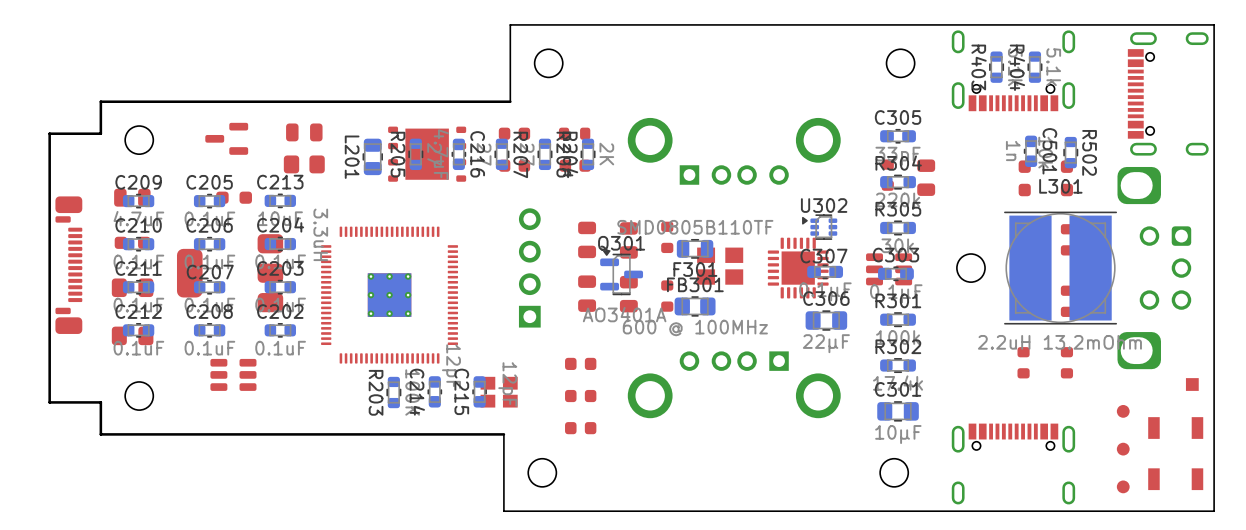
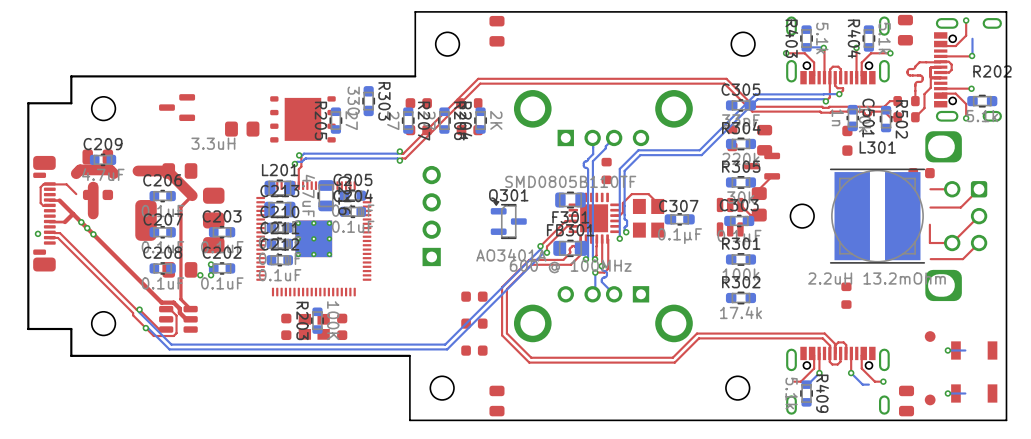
top track: none -> (966, 20) (966, 35) (955, 46) (942, 46) (940, 44)
via: none -> (966, 20)
part: none -> (905, 30)
part: none -> (496, 31)
bottom track: none -> (972, 38) (972, 55)
bottom track: none -> (806, 47) (823, 47)
top track: none -> (823, 47) (824, 77)
R403 position: (996, 67) -> (806, 38)
via: none -> (823, 47)
R404 position: (1034, 67) -> (868, 38)
top track: none -> (856, 47) (856, 77)
via: none -> (856, 47)
top track: none -> (786, 53) (804, 53) (814, 62) (814, 75) (812, 77)
via: none -> (786, 53)
top track: none -> (890, 53) (871, 53) (861, 62) (861, 75) (863, 77)
via: none -> (890, 53)
top track: none -> (972, 55) (940, 56)
via: none -> (972, 55)
top track: none -> (940, 72) (949, 72) (951, 69) (951, 64) (948, 61) (919, 62) (914, 68) (908, 70) (909, 75) (920, 75) (922, 77) (921, 81) (915, 83) (915, 101)
top track: none -> (835, 77) (835, 85) (837, 88) (843, 88) (839, 94)
top track: none -> (829, 77) (829, 97) (825, 101)
top track: none -> (840, 77) (840, 69) (838, 66) (832, 66) (830, 69) (830, 77)
top track: none -> (940, 77) (930, 78) (930, 87) (924, 94) (924, 108) (915, 117)
top track: none -> (940, 77) (940, 77) (930, 77) (930, 67) (940, 67) (931, 67) (930, 68) (930, 76) (931, 77) (940, 77)
top track: none -> (971, 88) (940, 88)
via: none -> (971, 88)
bottom track: none -> (839, 94) (755, 94) (699, 150) (638, 150) (619, 168) (619, 238)
via: none -> (839, 94)
top track: none -> (940, 95) (942, 93) (955, 93) (966, 104) (966, 118)
bottom track: none -> (825, 101) (823, 99) (757, 99) (701, 155) (640, 155) (624, 170) (624, 218) (627, 221) (624, 230) (626, 232)
via: none -> (825, 101)
top track: none -> (897, 101) (889, 101) (884, 106) (754, 106) (726, 78) (478, 78) (403, 153) (399, 151)
part: none -> (906, 101)
part: (304, 132) -> none
C216 footprint: [451, 138, 467, 171] -> [317, 180, 335, 212]
top track: none -> (897, 117) (889, 117) (884, 111) (872, 111) (869, 115) (865, 115) (862, 111) (752, 111) (724, 83) (480, 83) (405, 158) (399, 160)
part: none -> (906, 117)
via: none -> (966, 118)
part position: (427, 154) -> (302, 119)
L201 rotation: 0° (372, 156) -> 90° clockwise (279, 188)
L201 position: (372, 156) -> (279, 188)
bottom track: none -> (592, 137) (593, 154) (583, 163) (584, 166) (588, 169) (588, 257) (585, 259)
bottom track: none -> (614, 137) (592, 161) (592, 257) (595, 259)
R202 side: top (1066, 178) -> bottom (982, 101)
bottom track: none -> (399, 151) (397, 153) (303, 153) (299, 155)
via: none -> (399, 151)
C213 footprint: [264, 193, 296, 209] -> [264, 200, 296, 219]
top track: none -> (299, 155) (301, 157) (301, 166) (298, 169) (298, 185)
via: none -> (299, 155)
R303 side: top (234, 197) -> bottom (368, 101)
C205 position: (209, 201) -> (352, 195)
bottom track: none -> (399, 160) (397, 158) (305, 158) (294, 164)
via: none -> (399, 160)
via: none -> (294, 164)
part: none -> (762, 166)
top track: none -> (116, 170) (113, 173) (110, 169) (80, 169) (76, 173)
top track: none -> (137, 170) (168, 170) (192, 195) (180, 207) (180, 299) (190, 309)
part: none -> (179, 170)
part: none -> (606, 170)
part: none -> (921, 173)
top track: none -> (772, 176) (759, 189) (759, 193)
U302: (819, 227) -> none
top track: none -> (96, 183) (93, 187) (93, 213)
top track: none -> (952, 189) (930, 189)
top track: none -> (979, 189) (960, 207) (930, 207)
part: (667, 237) -> none
part footprint: [767, 237, 829, 299] -> [632, 198, 665, 238]
part: (587, 239) -> none
part: (1066, 239) -> none
part: (628, 240) -> none
top track: none -> (76, 194) (66, 184) (43, 184) (40, 187) (40, 203) (43, 205) (49, 205)
C210 position: (138, 244) -> (279, 227)
C204 position: (280, 244) -> (352, 211)
part footprint: [697, 247, 744, 285] -> [568, 192, 620, 244]
top track: none -> (49, 200) (59, 200) (161, 302) (173, 302) (186, 319) (190, 319)
part: none -> (759, 204)
top track: none -> (740, 204) (750, 215) (759, 215)
top track: none -> (657, 206) (657, 203) (648, 194) (631, 194) (622, 203) (622, 212) (619, 215) (614, 215)
top track: none -> (73, 213) (65, 222) (49, 222)
top track: none -> (979, 216) (952, 243) (929, 243) (929, 224)
part rotation: 0° (889, 269) -> 90° clockwise (730, 217)
top track: none -> (573, 220) (565, 221) (540, 246)
via: none -> (81, 222)
top track: none -> (573, 226) (567, 226) (546, 246) (546, 252)
via: none -> (87, 228)
top track: none -> (49, 232) (59, 233) (136, 309) (139, 309) (159, 329) (166, 329)
part: (132, 287) -> none
C211 position: (138, 287) -> (279, 243)
via: none -> (626, 232)
via: none -> (37, 233)
via: none -> (93, 234)
part: (587, 293) -> none
top track: none -> (49, 238) (57, 237) (153, 335) (173, 335) (176, 333) (176, 315) (169, 309) (166, 309)
part: (628, 294) -> none
via: none -> (619, 238)
top track: none -> (580, 239) (580, 242) (576, 246) (572, 246) (569, 249) (570, 253) (563, 259) (529, 259) (502, 287) (502, 335) (529, 362) (674, 362) (698, 338) (822, 338) (830, 345) (829, 353)
top track: none -> (586, 239) (586, 249) (570, 264) (531, 264) (506, 289) (506, 333) (531, 357) (672, 357) (696, 333) (824, 333) (834, 343) (835, 353)
top track: none -> (596, 239) (595, 259)
top track: none -> (602, 239) (601, 266)
top track: none -> (607, 239) (608, 268) (604, 272) (595, 272)
part: (667, 296) -> none
top track: none -> (979, 243) (962, 259) (930, 259)
part: (1066, 301) -> none
bottom track: none -> (540, 246) (540, 249) (445, 344) (171, 344) (139, 312) (139, 309)
via: none -> (540, 246)
bottom track: none -> (546, 252) (543, 252) (447, 349) (169, 349) (148, 328) (145, 328)
via: none -> (546, 252)
via: none -> (585, 259)
via: none -> (595, 259)
C306: 22µF (826, 320) -> none
via: none -> (211, 264)
bottom track: none -> (601, 266) (602, 269) (606, 273) (601, 281) (614, 294)
via: none -> (601, 266)
C212 position: (138, 330) -> (279, 260)
part: none -> (179, 269)
part: (132, 335) -> none
bottom track: none -> (595, 272) (595, 291) (592, 294)
via: none -> (595, 272)
via: none -> (200, 275)
via: none -> (211, 275)
R409 side: top (1066, 362) -> bottom (806, 393)
part position: (233, 374) -> (178, 319)
via: none -> (139, 309)
part: (1192, 384) -> none
C214 side: bottom (434, 391) -> top (342, 326)
C215 side: bottom (479, 391) -> top (286, 326)
part position: (499, 392) -> (314, 326)
via: none -> (145, 328)
C301: 10µF (898, 411) -> none
via: none -> (947, 350)
bottom track: none -> (965, 350) (947, 350)
top track: none -> (812, 353) (814, 355) (814, 368) (800, 381) (794, 381)
top track: none -> (819, 353) (819, 373)
top track: none -> (840, 353) (840, 361) (837, 364) (832, 364) (829, 361) (829, 353)
top track: none -> (846, 353) (846, 345) (843, 342) (838, 342) (835, 345) (835, 353)
top track: none -> (851, 353) (851, 373)
top track: none -> (863, 353) (861, 355) (861, 368) (874, 381) (883, 381)
part: (1123, 449) -> none
bottom track: none -> (819, 373) (806, 384)
via: none -> (819, 373)
bottom track: none -> (851, 373) (862, 384) (868, 384)
via: none -> (851, 373)
via: none -> (883, 381)
via: none -> (947, 393)
bottom track: none -> (965, 393) (947, 393)
part: none -> (496, 401)
part: none -> (906, 401)

